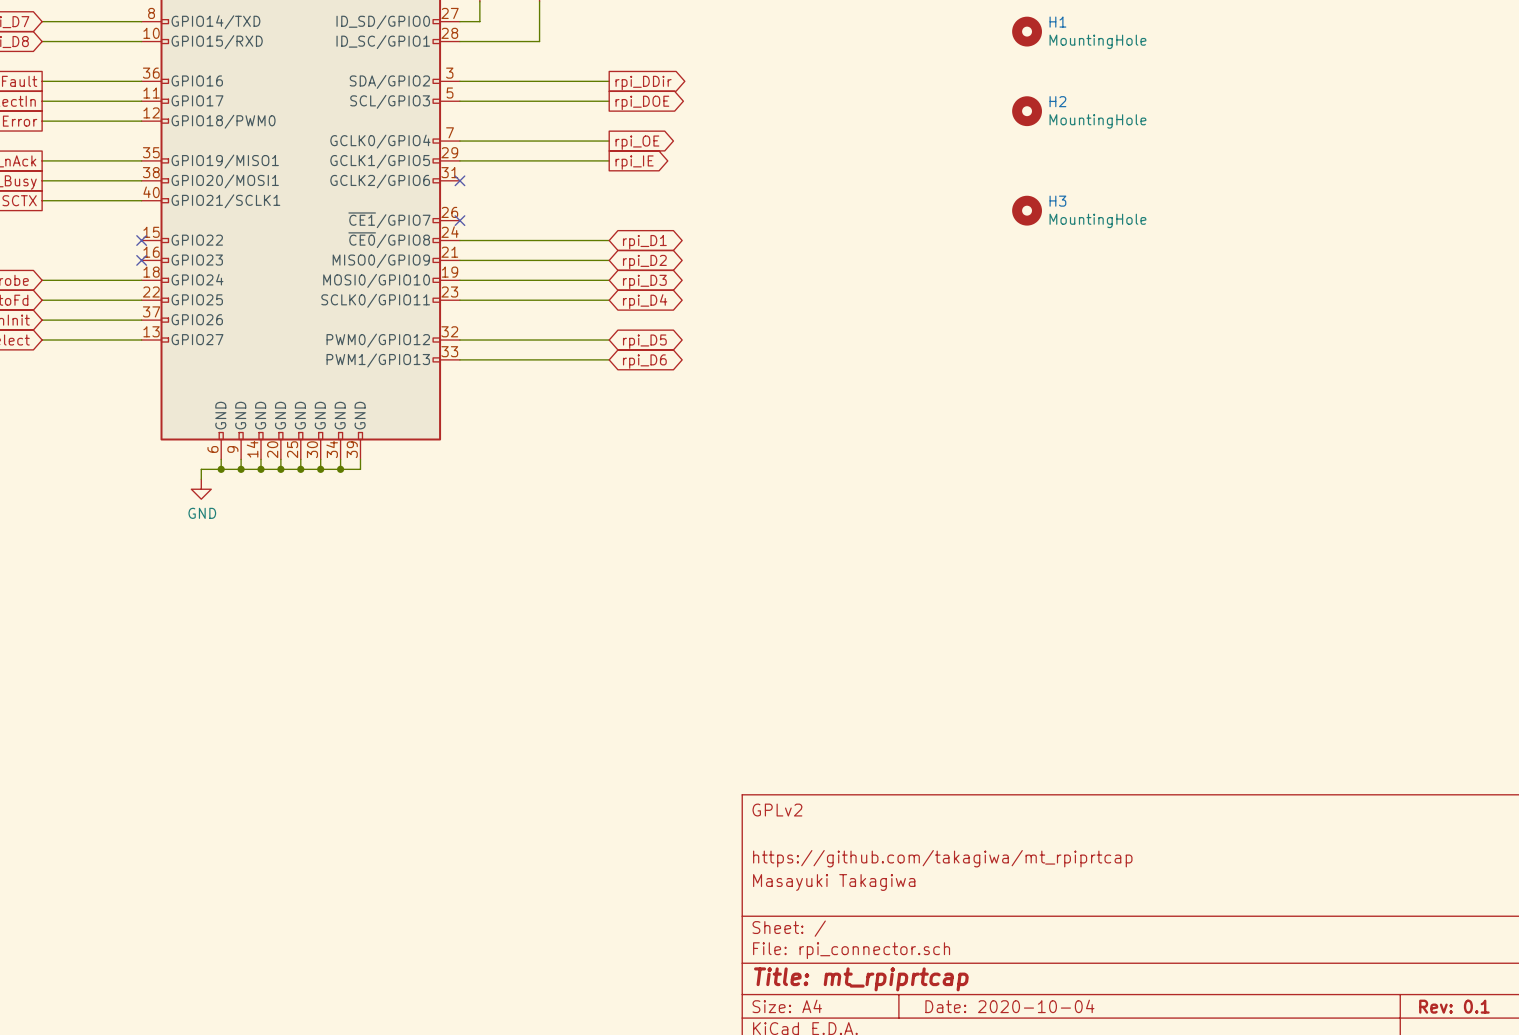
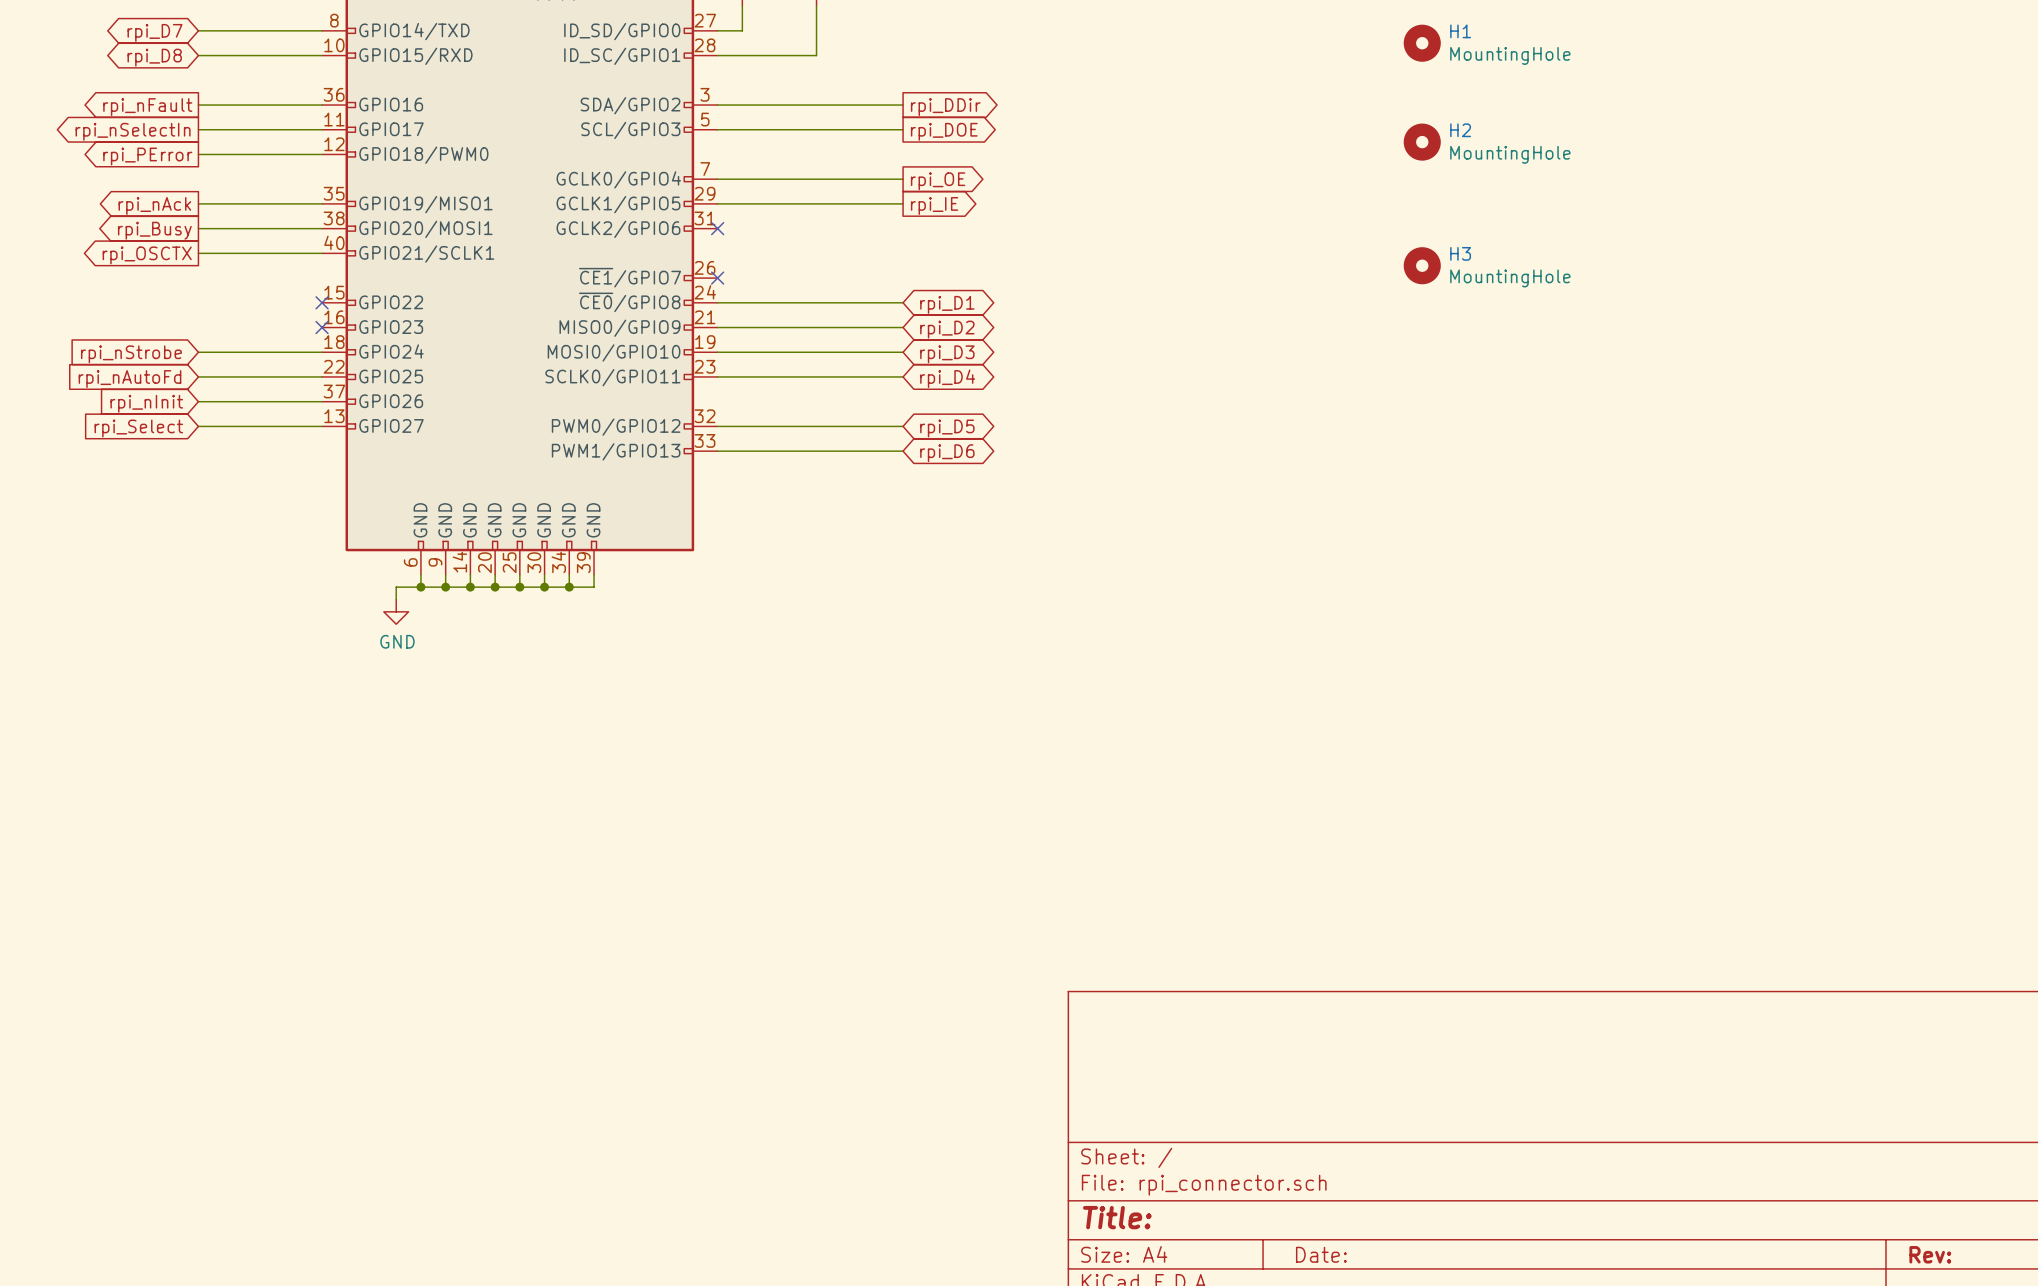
title block: GPLv2 (777, 810) -> none
title block: https://github.com/takagiwa/mt_rpiprtcap (942, 858) -> none
title block: Masayuki Takagiwa (834, 882) -> none
title block: Title: mt_rpiprtcap (861, 979) -> Title: (1117, 1217)
title block: Date: 2020-10-04 (1009, 1006) -> Date: (1321, 1254)
title block: Rev: 0.1 (1454, 1006) -> Rev: (1930, 1254)

